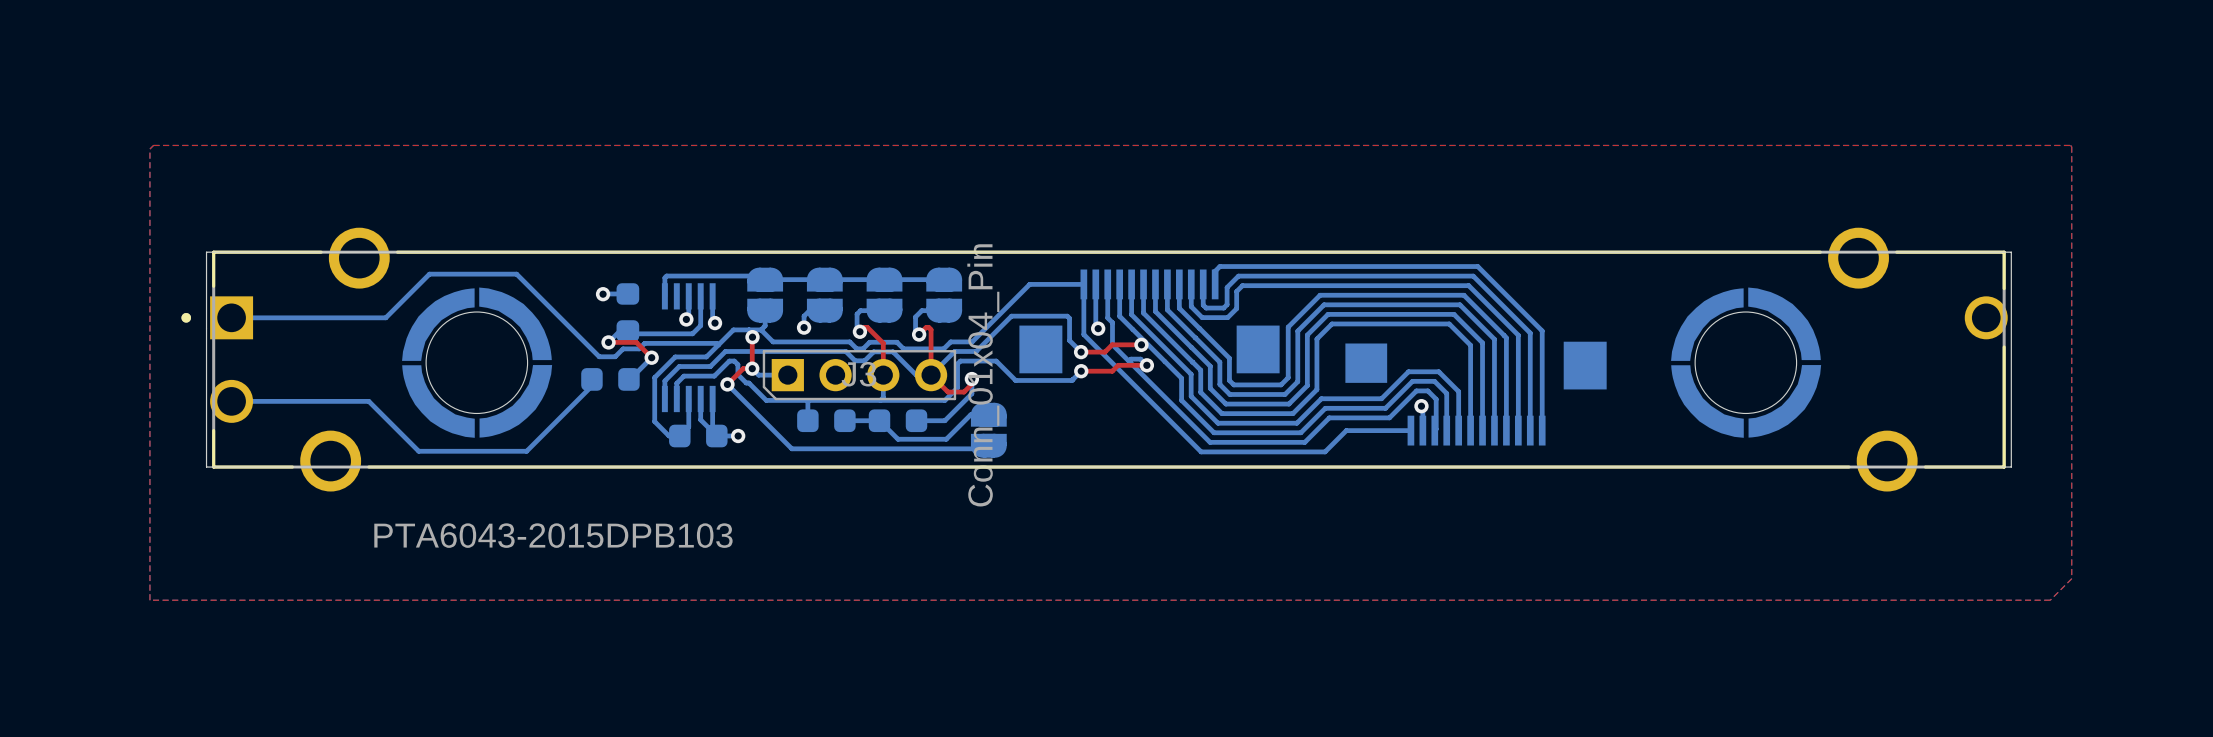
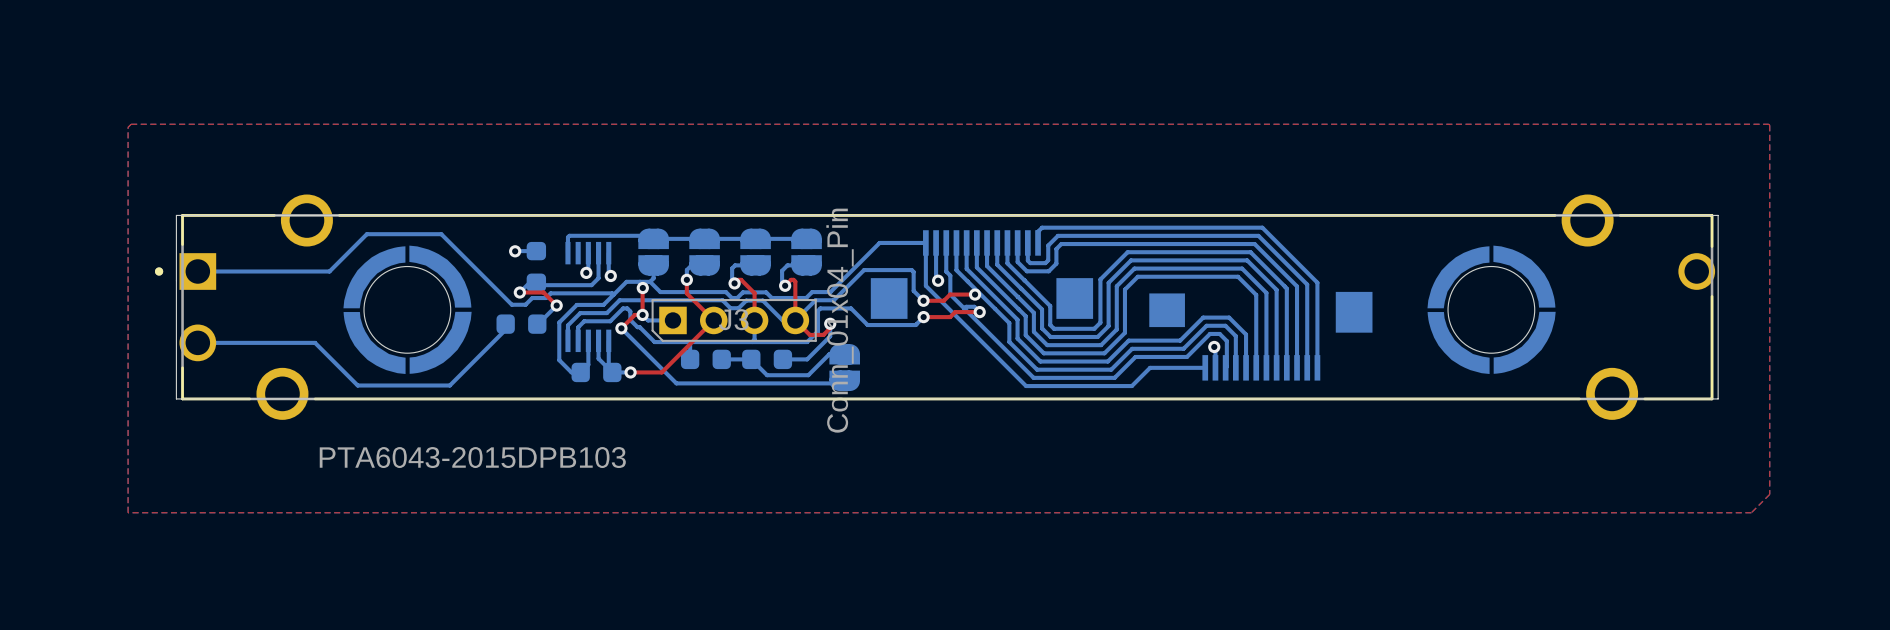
top track: none -> (686, 279) (686, 293) (713, 320) (661, 372) (630, 372)

